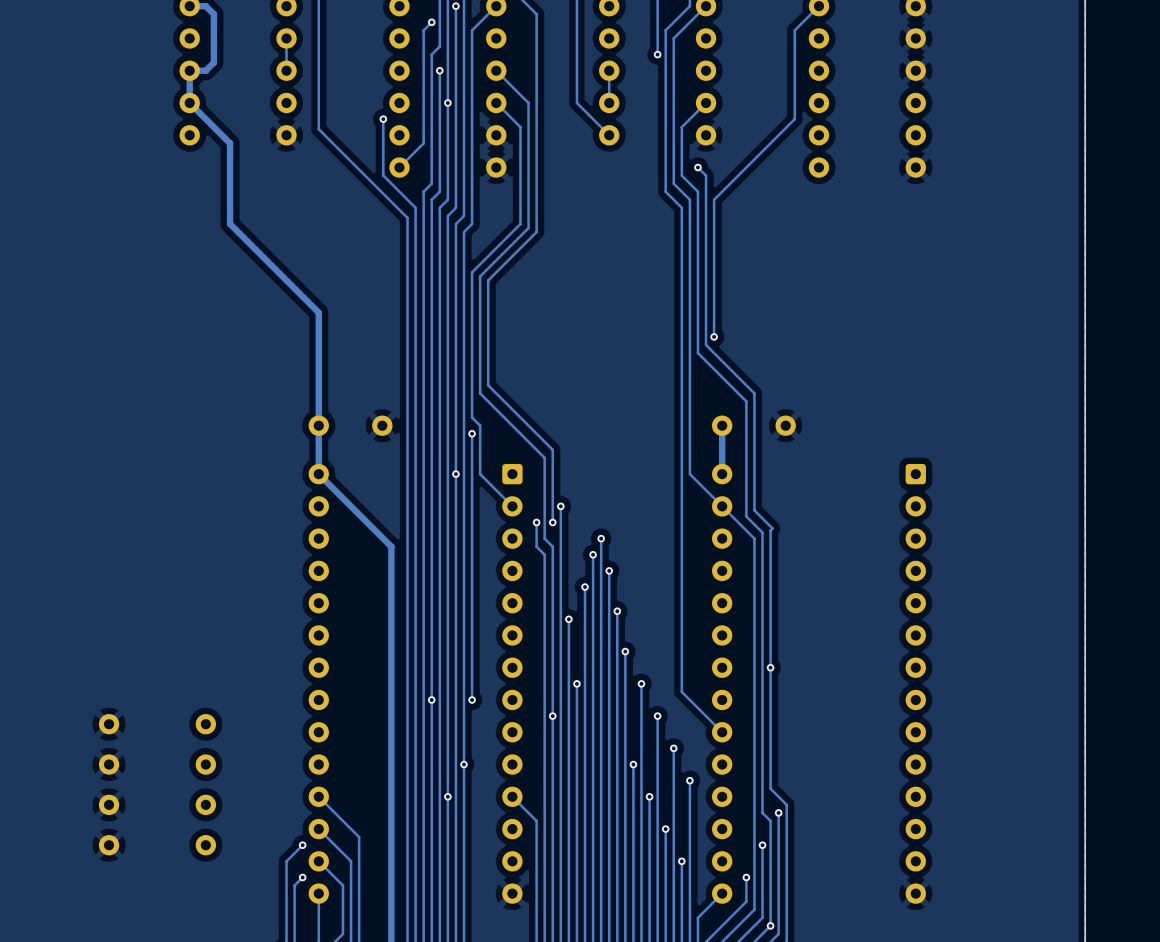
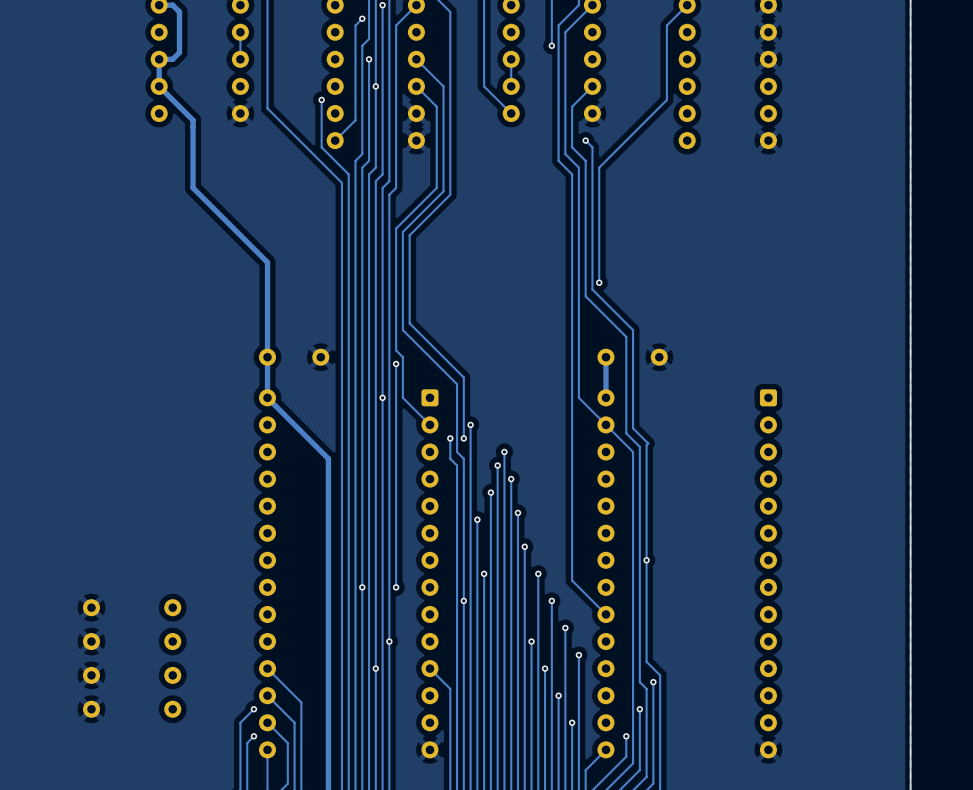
via: (770, 925) -> none

